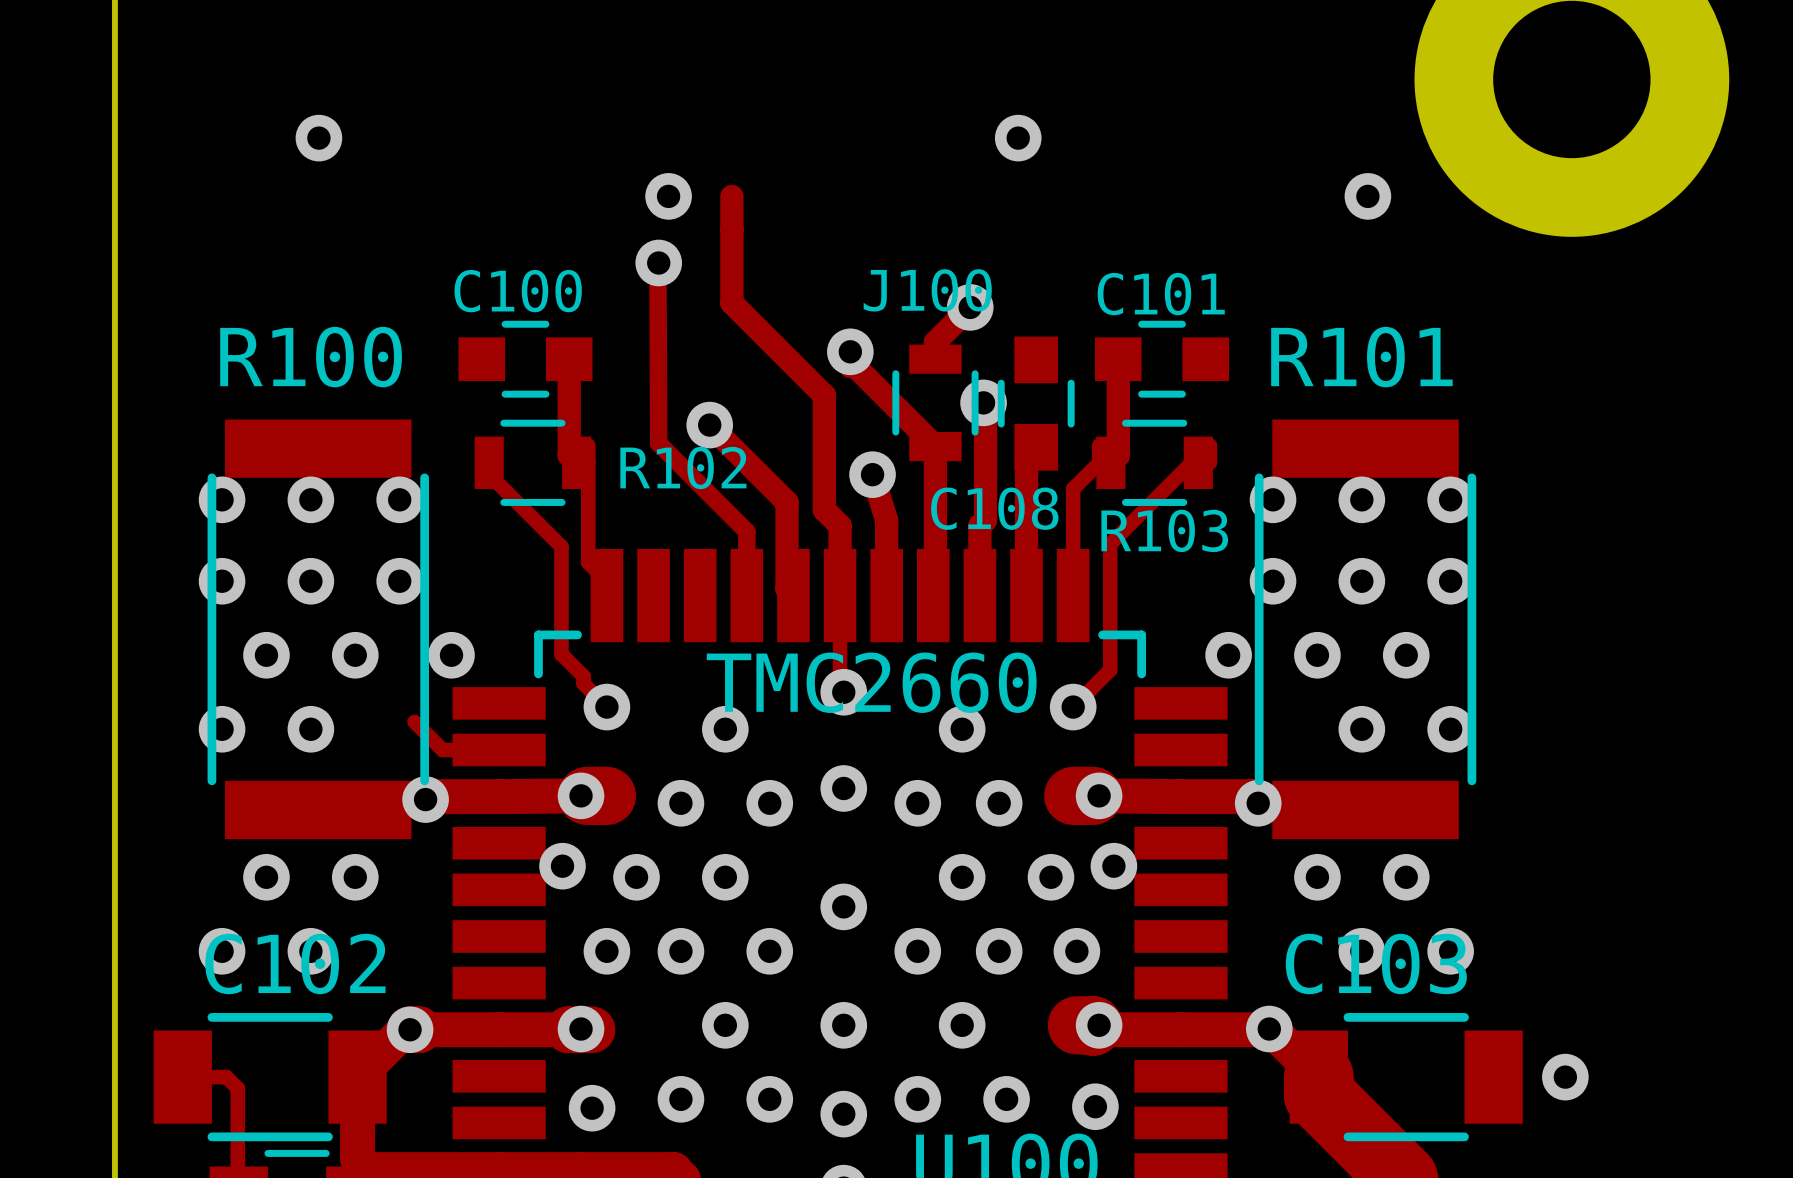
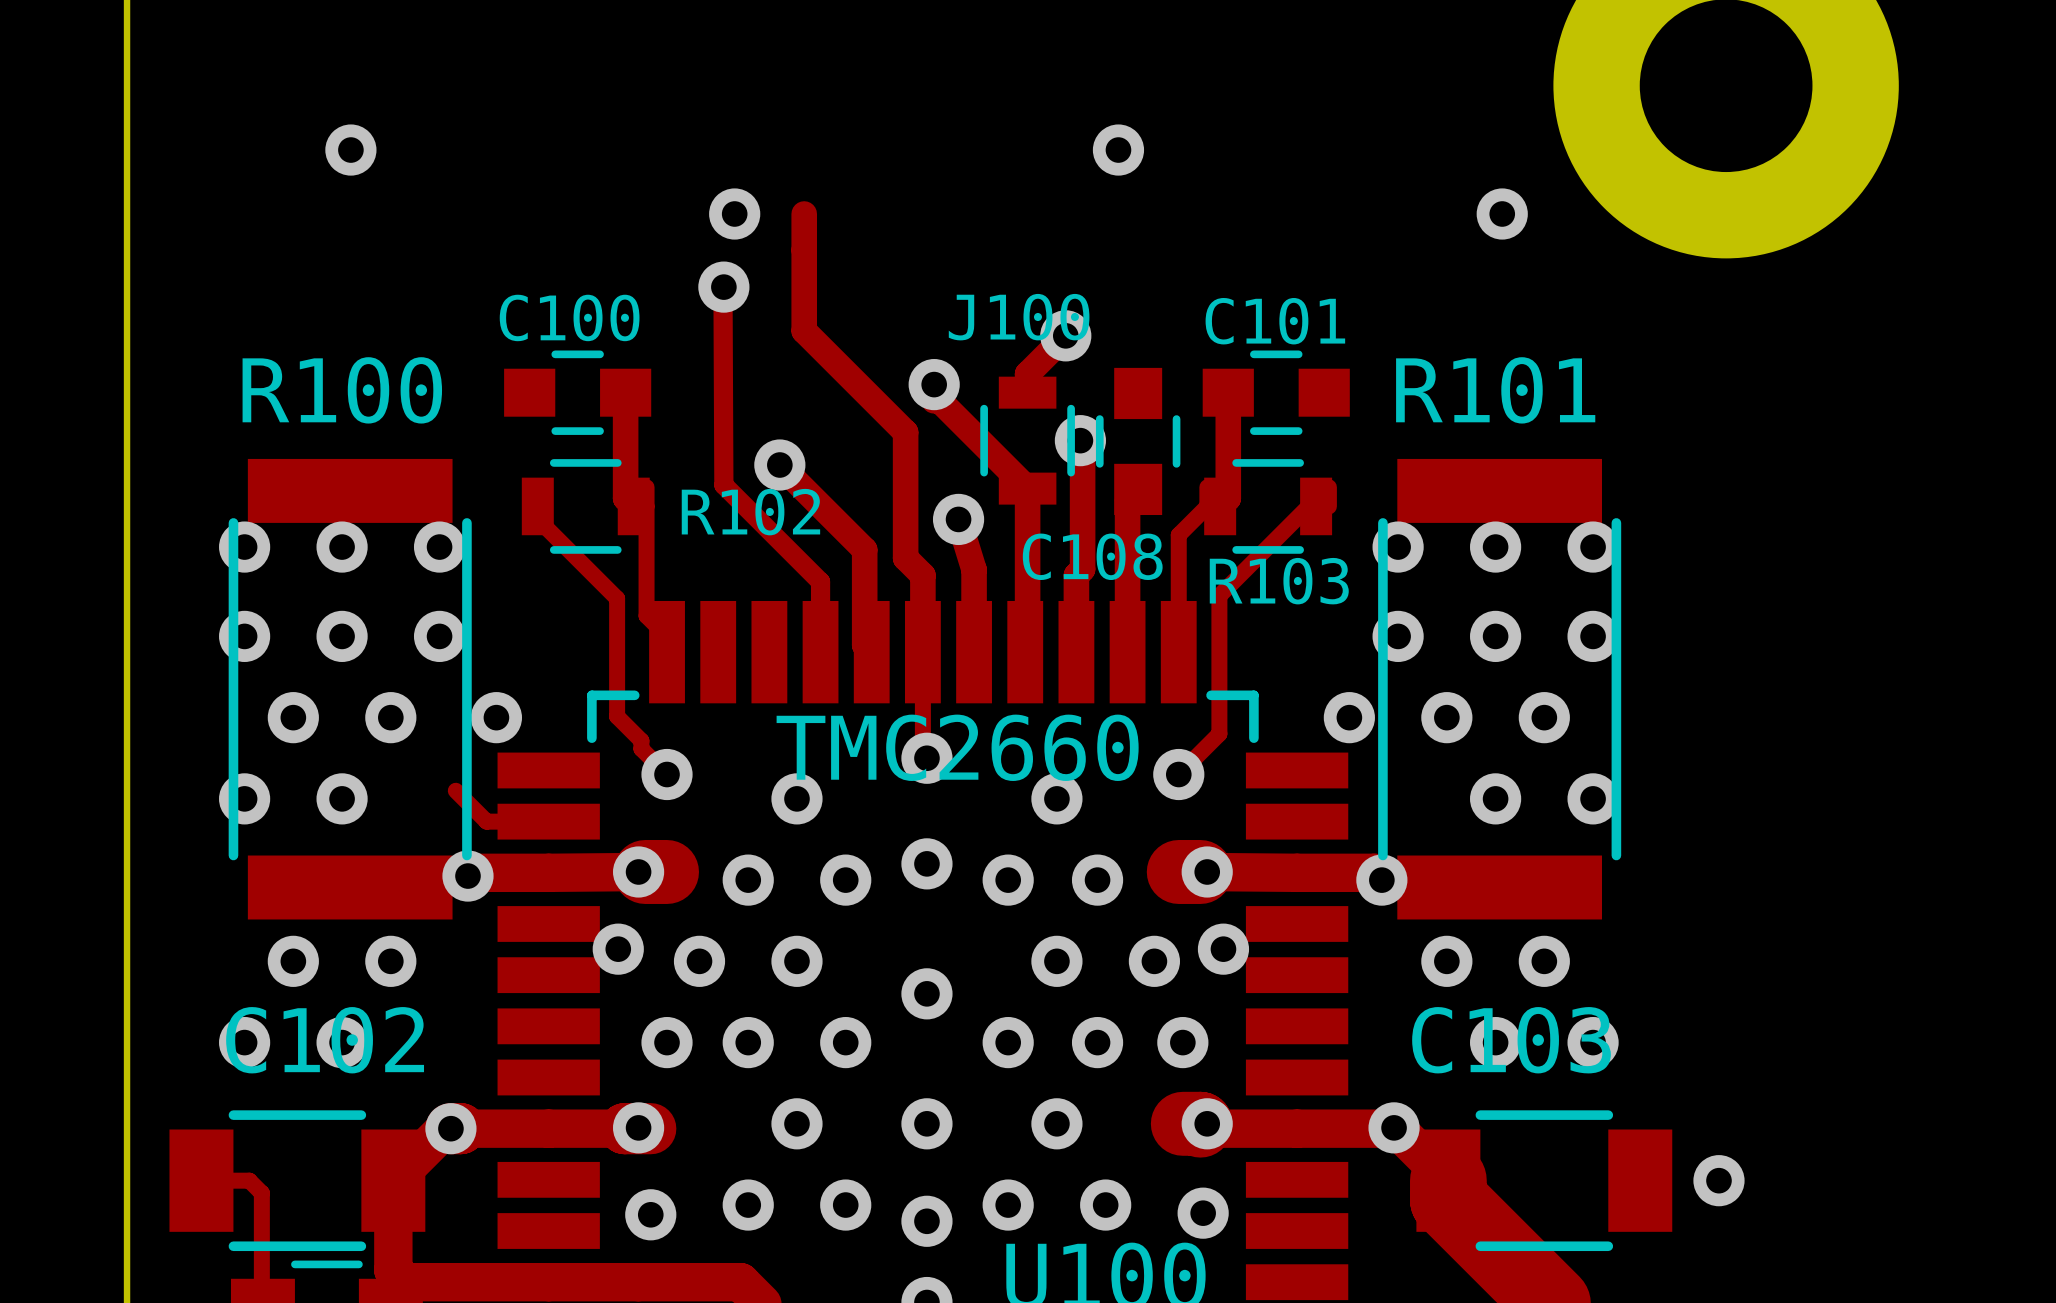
C102 name position: C102 (295, 963) -> C102 (325, 1040)
C103 name position: C103 (1376, 963) -> C103 (1511, 1040)

